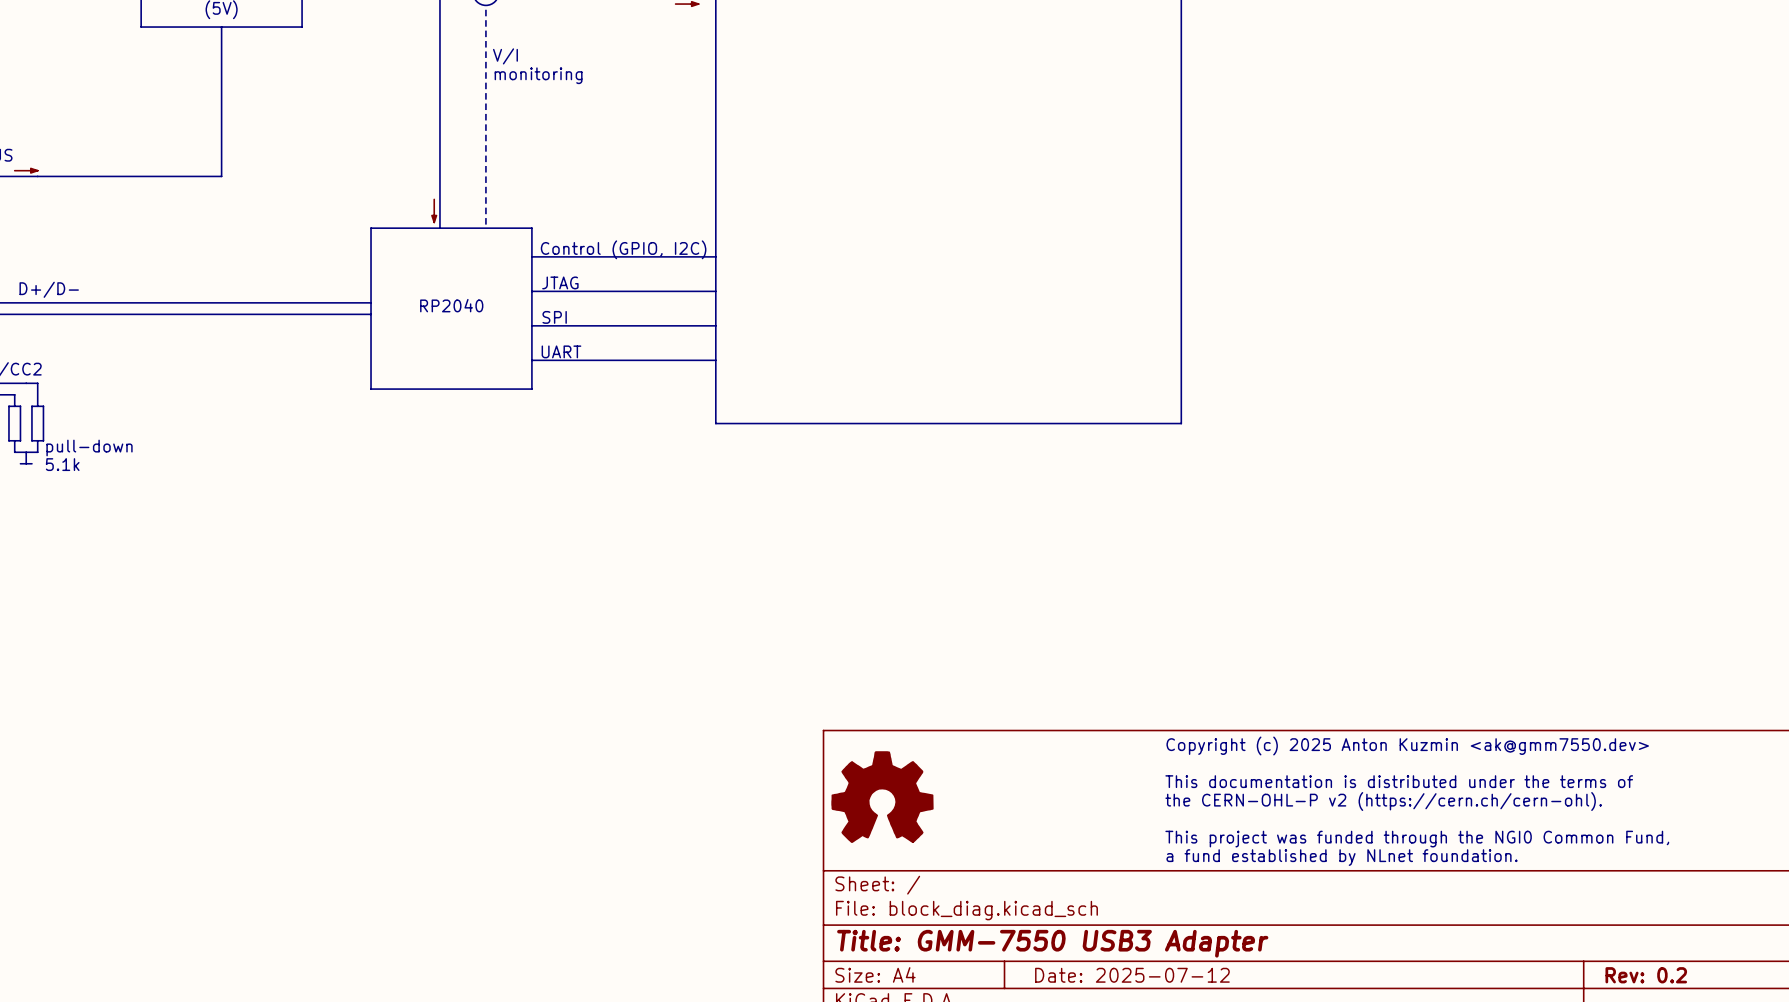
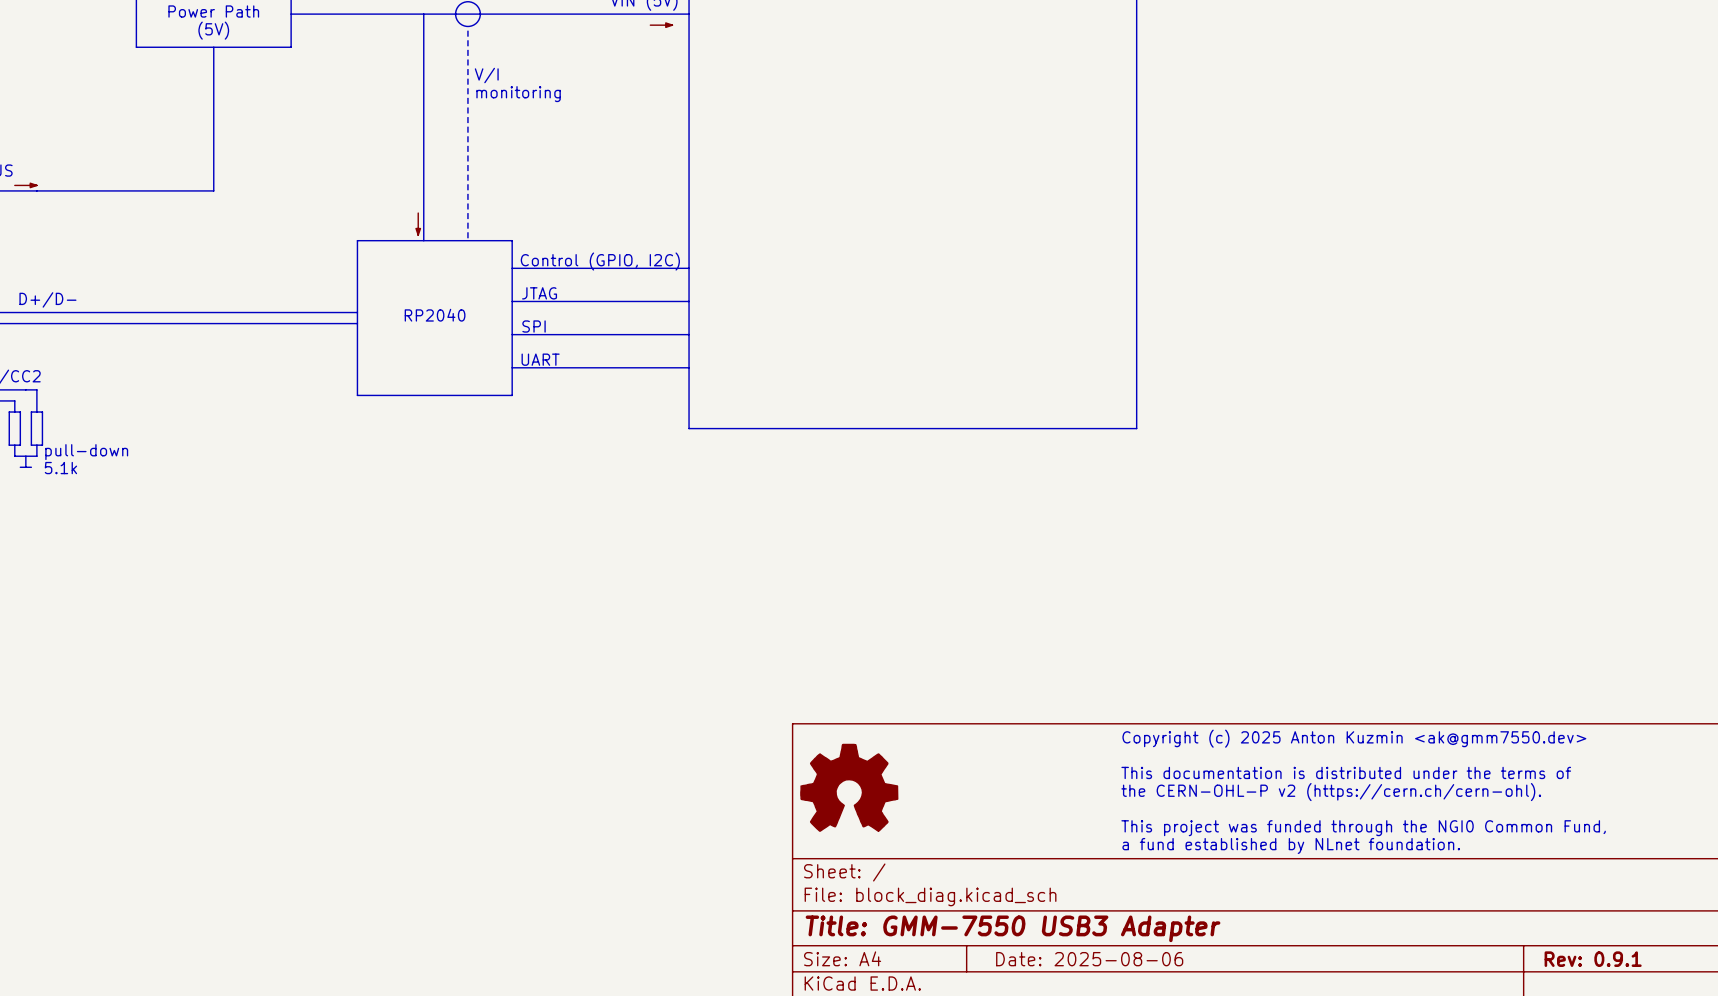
title block: Date: 2025-07-12 (1132, 975) -> Date: 2025-08-06 (1089, 959)
title block: Rev: 0.2 (1646, 975) -> Rev: 0.9.1 (1593, 959)

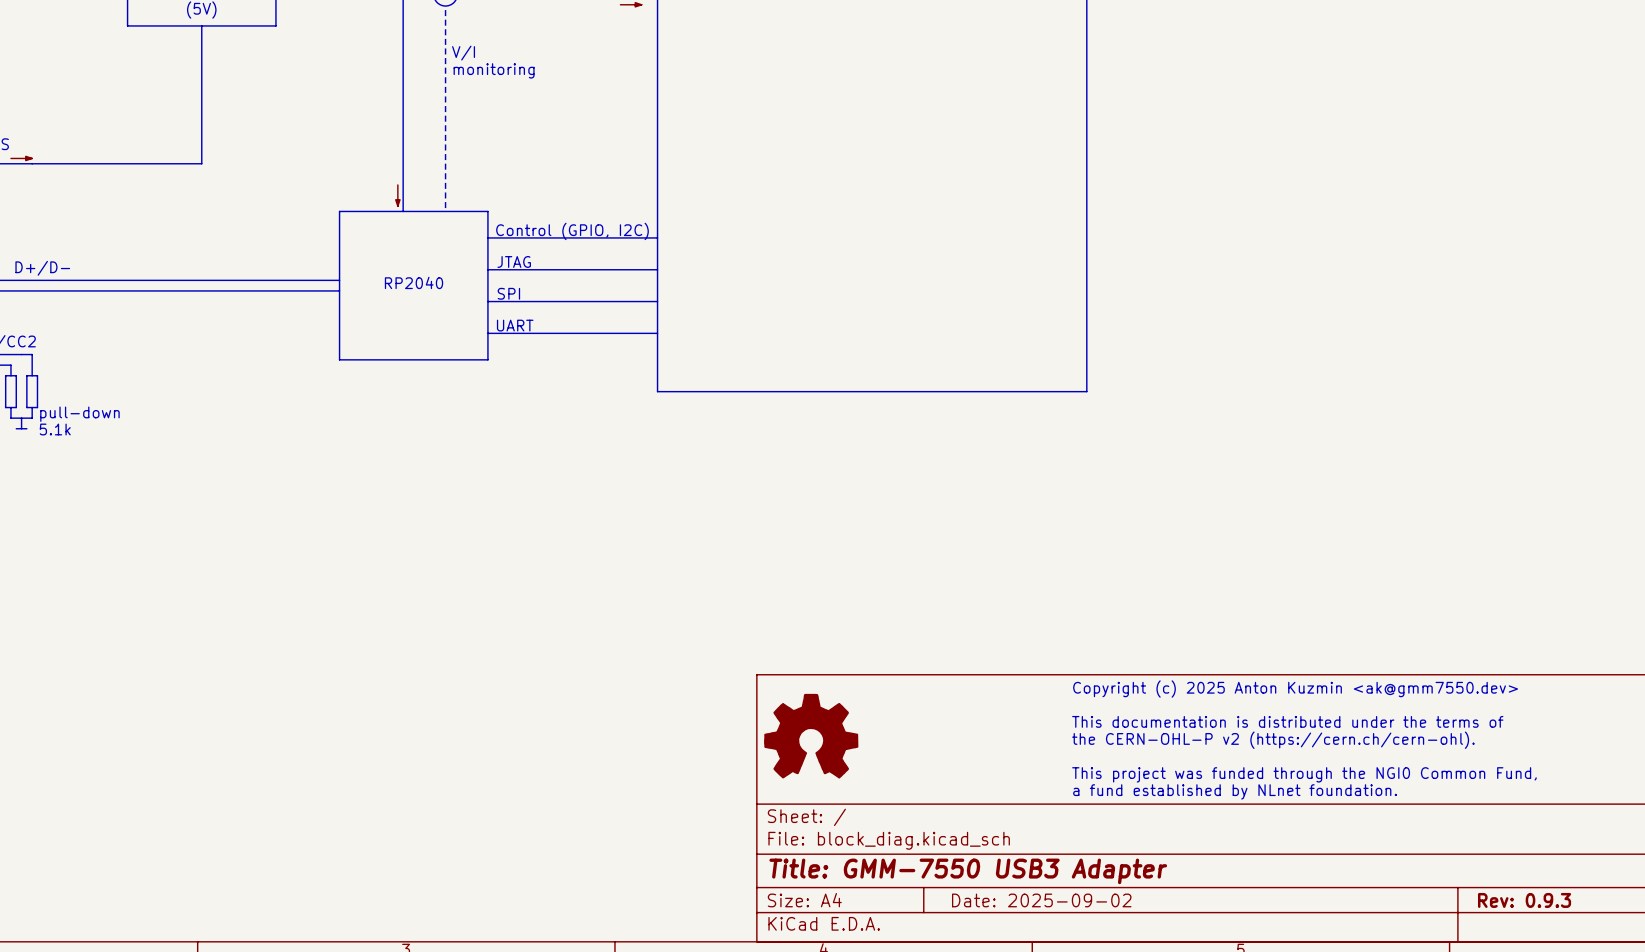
title block: Date: 2025-08-06 (1089, 959) -> Date: 2025-09-02 (1041, 900)
title block: Rev: 0.9.1 (1593, 959) -> Rev: 0.9.3 (1524, 900)

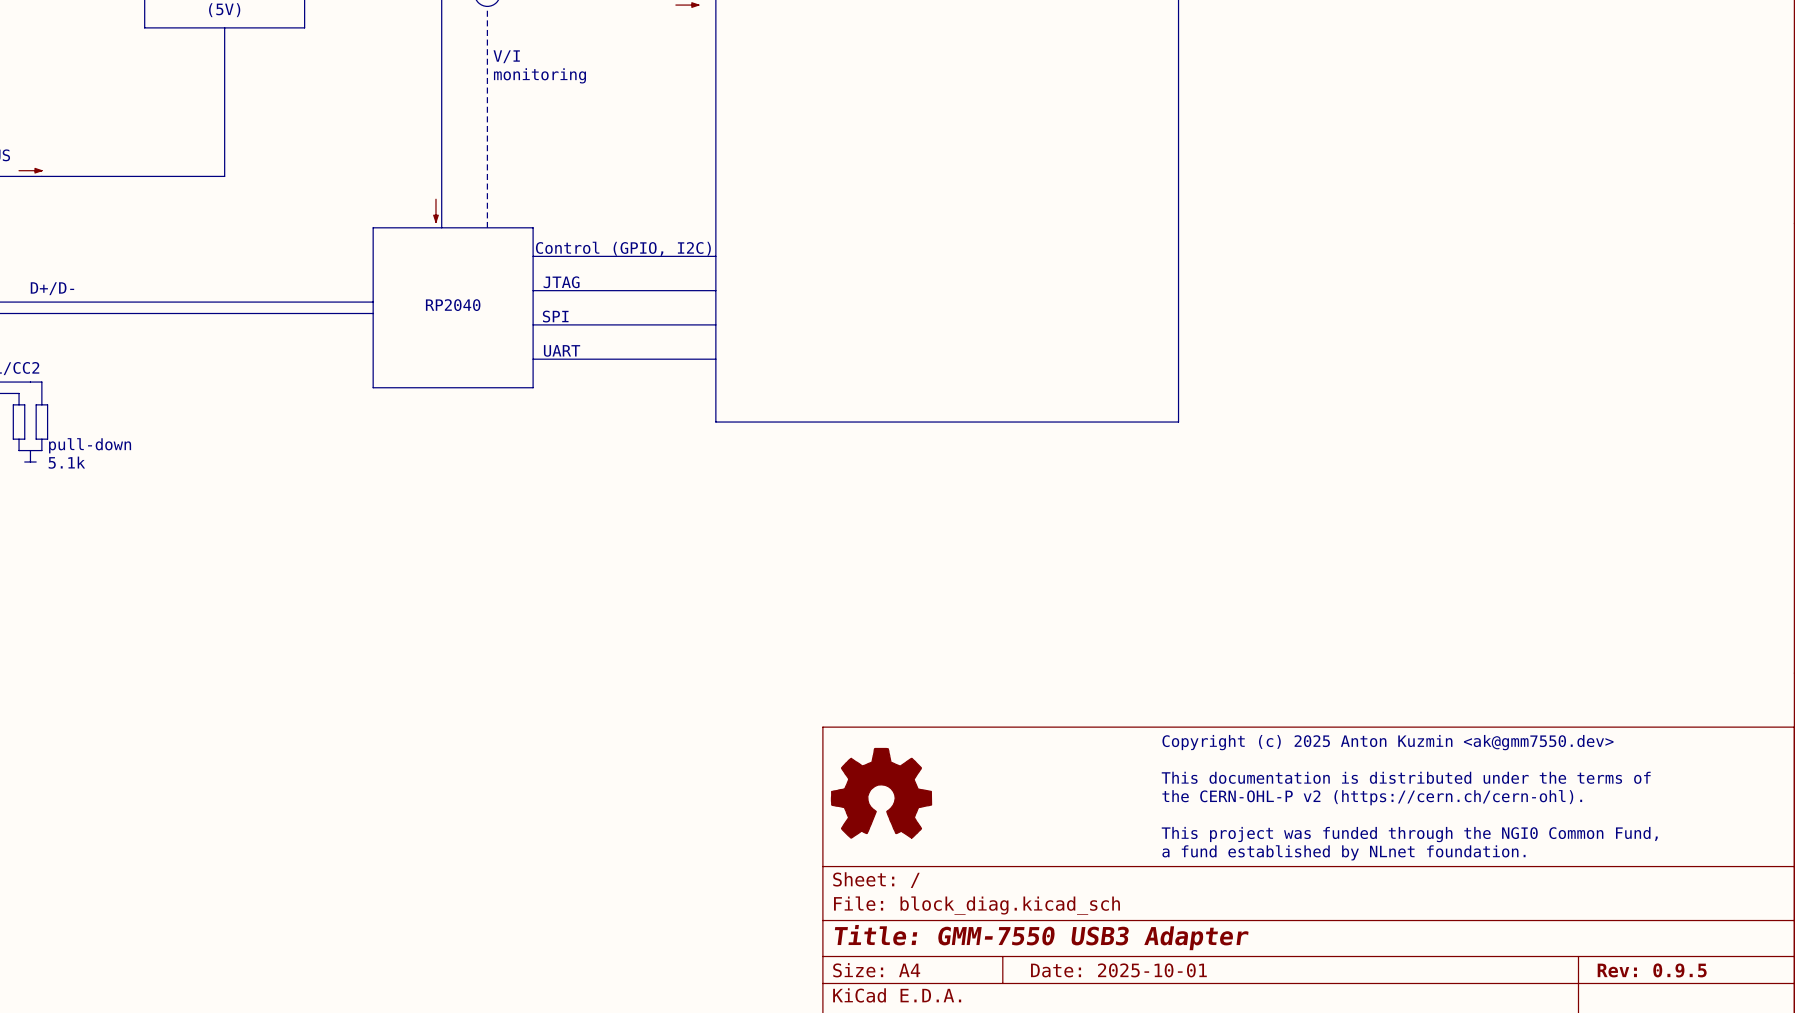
title block: Date: 2025-09-02 (1041, 900) -> Date: 2025-10-01 (1118, 970)
title block: Rev: 0.9.3 (1524, 900) -> Rev: 0.9.5 (1652, 970)

